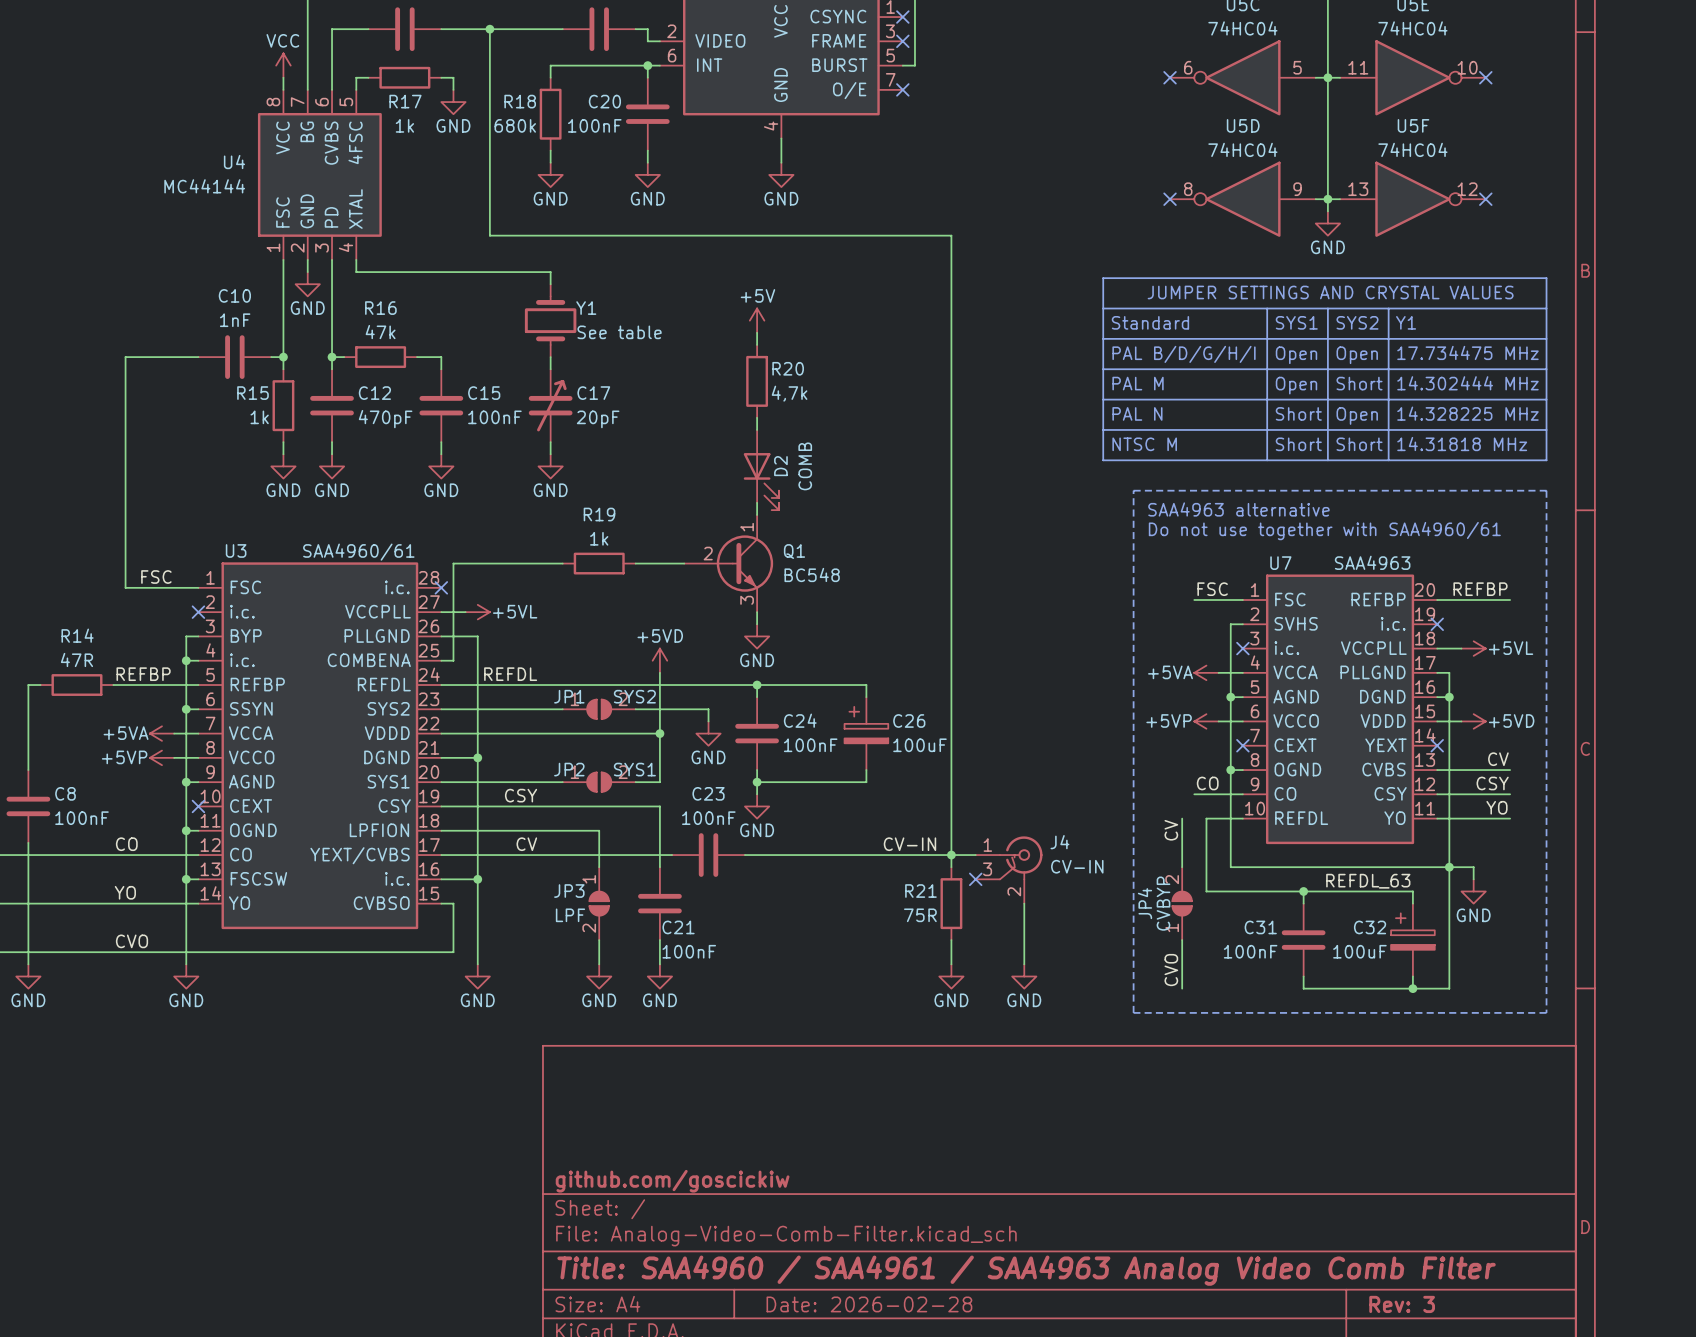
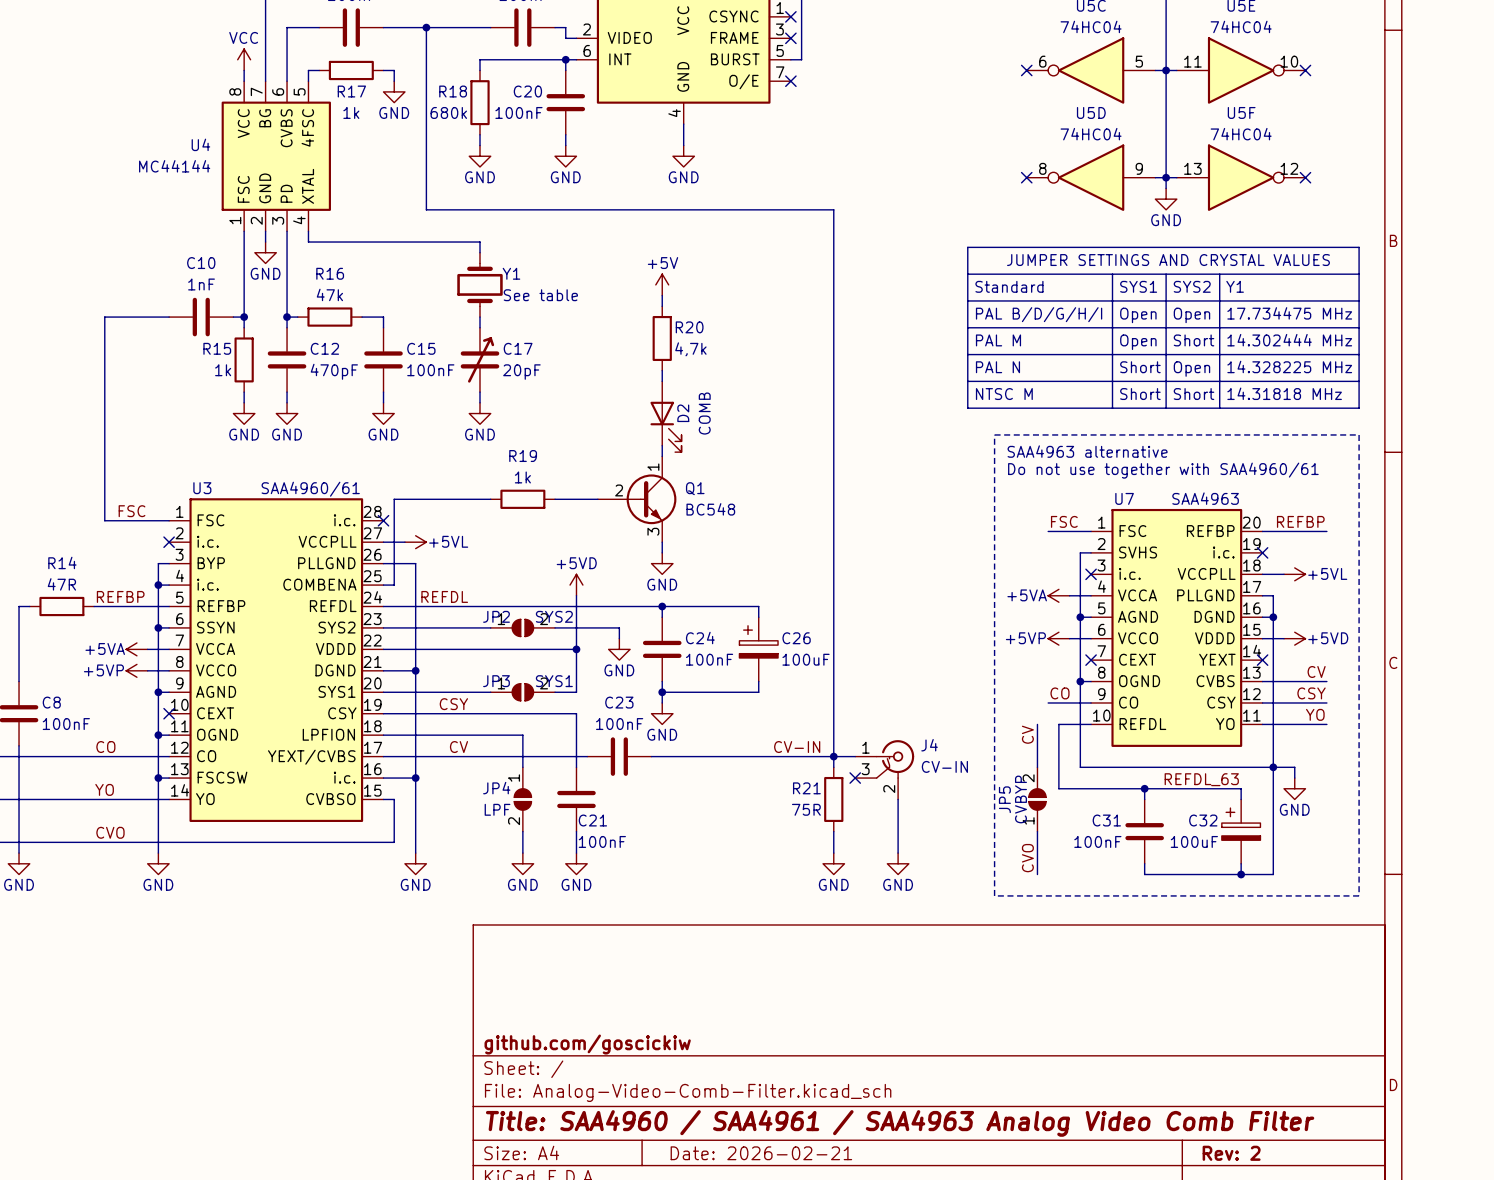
JP1 name: JP1 (569, 696) -> JP2 (496, 616)
JP2 name: JP2 (569, 769) -> JP3 (496, 681)
JP3 name: JP3 (569, 891) -> JP4 (496, 788)
JP4 name: JP4 (1144, 903) -> JP5 (1004, 799)
title block: Date: 2026-02-28 (869, 1304) -> Date: 2026-02-21 (761, 1153)
title block: Rev: 3 (1402, 1304) -> Rev: 2 (1231, 1153)

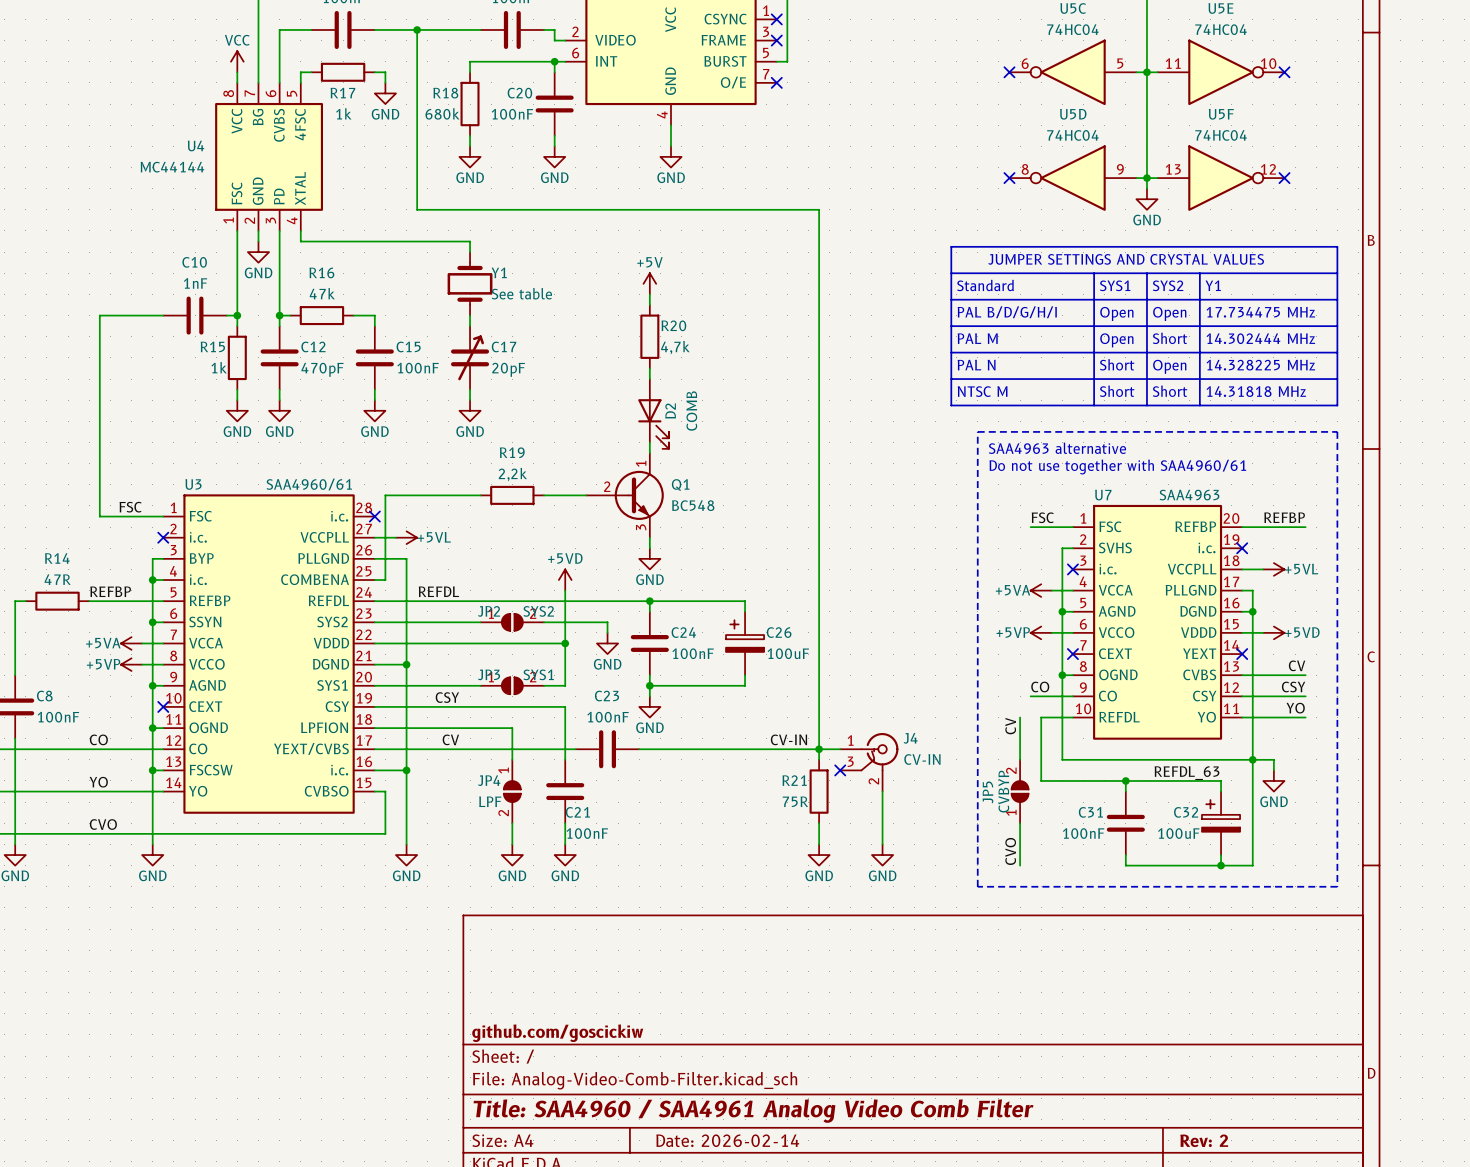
R19 value: 1k (522, 477) -> 2,2k (512, 474)
title block: Title: SAA4960 / SAA4961 / SAA4963 Analog Video Comb Filter (900, 1123) -> Title: SAA4960 / SAA4961 Analog Video Comb Filter (753, 1111)
title block: Date: 2026-02-21 (761, 1153) -> Date: 2026-02-14 (727, 1140)

